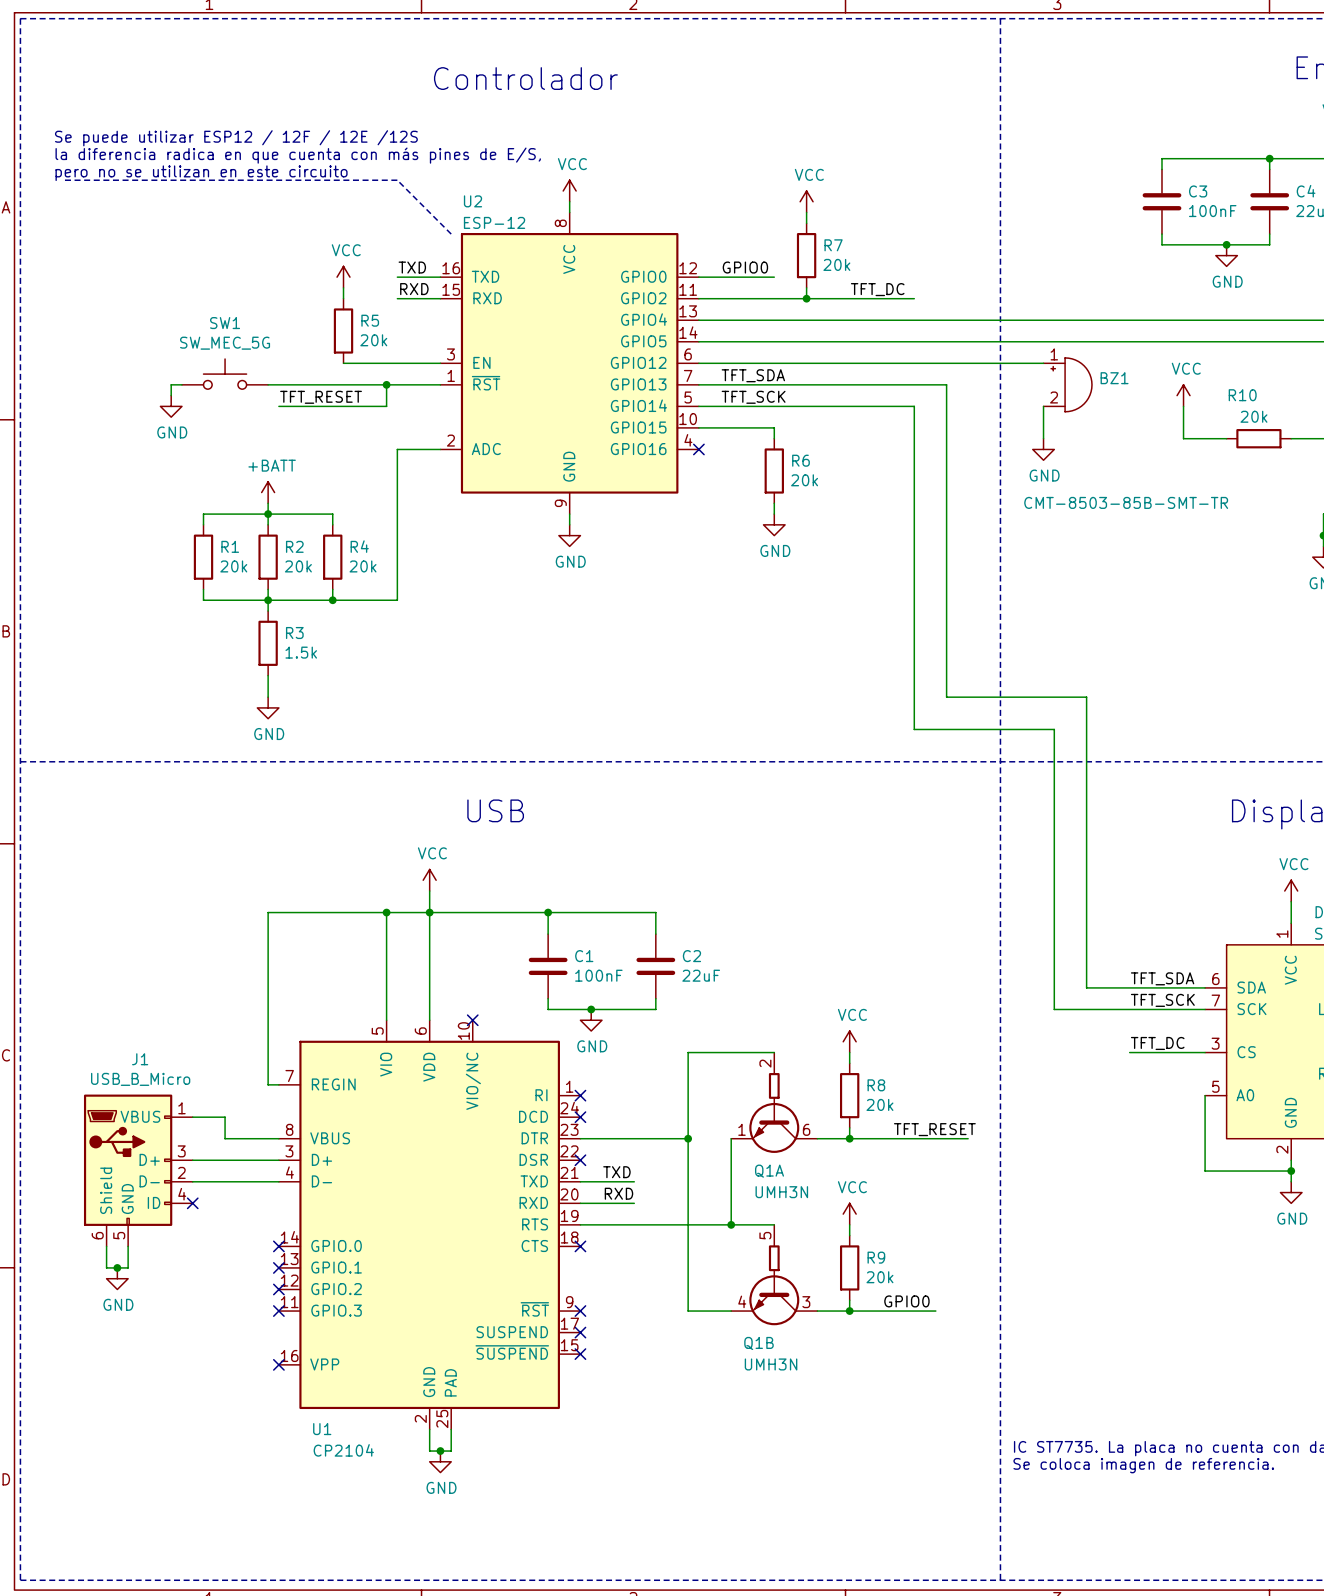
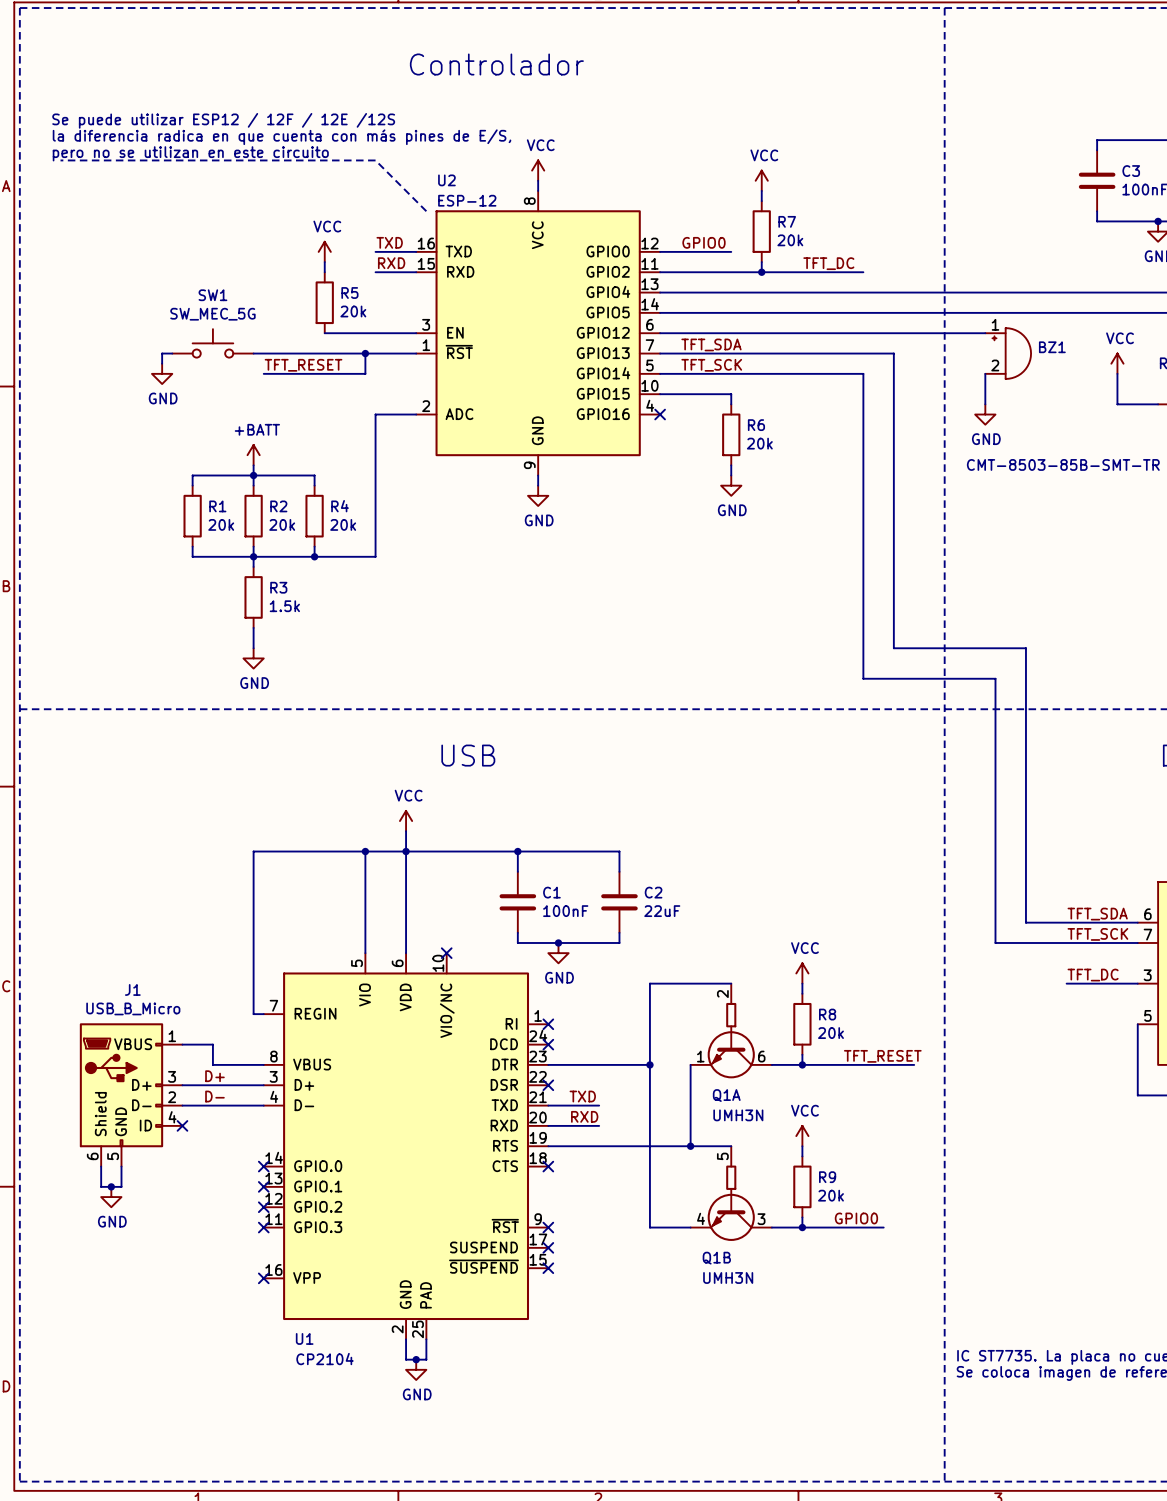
label: none -> D+ (214, 1076)
label: none -> D- (214, 1096)

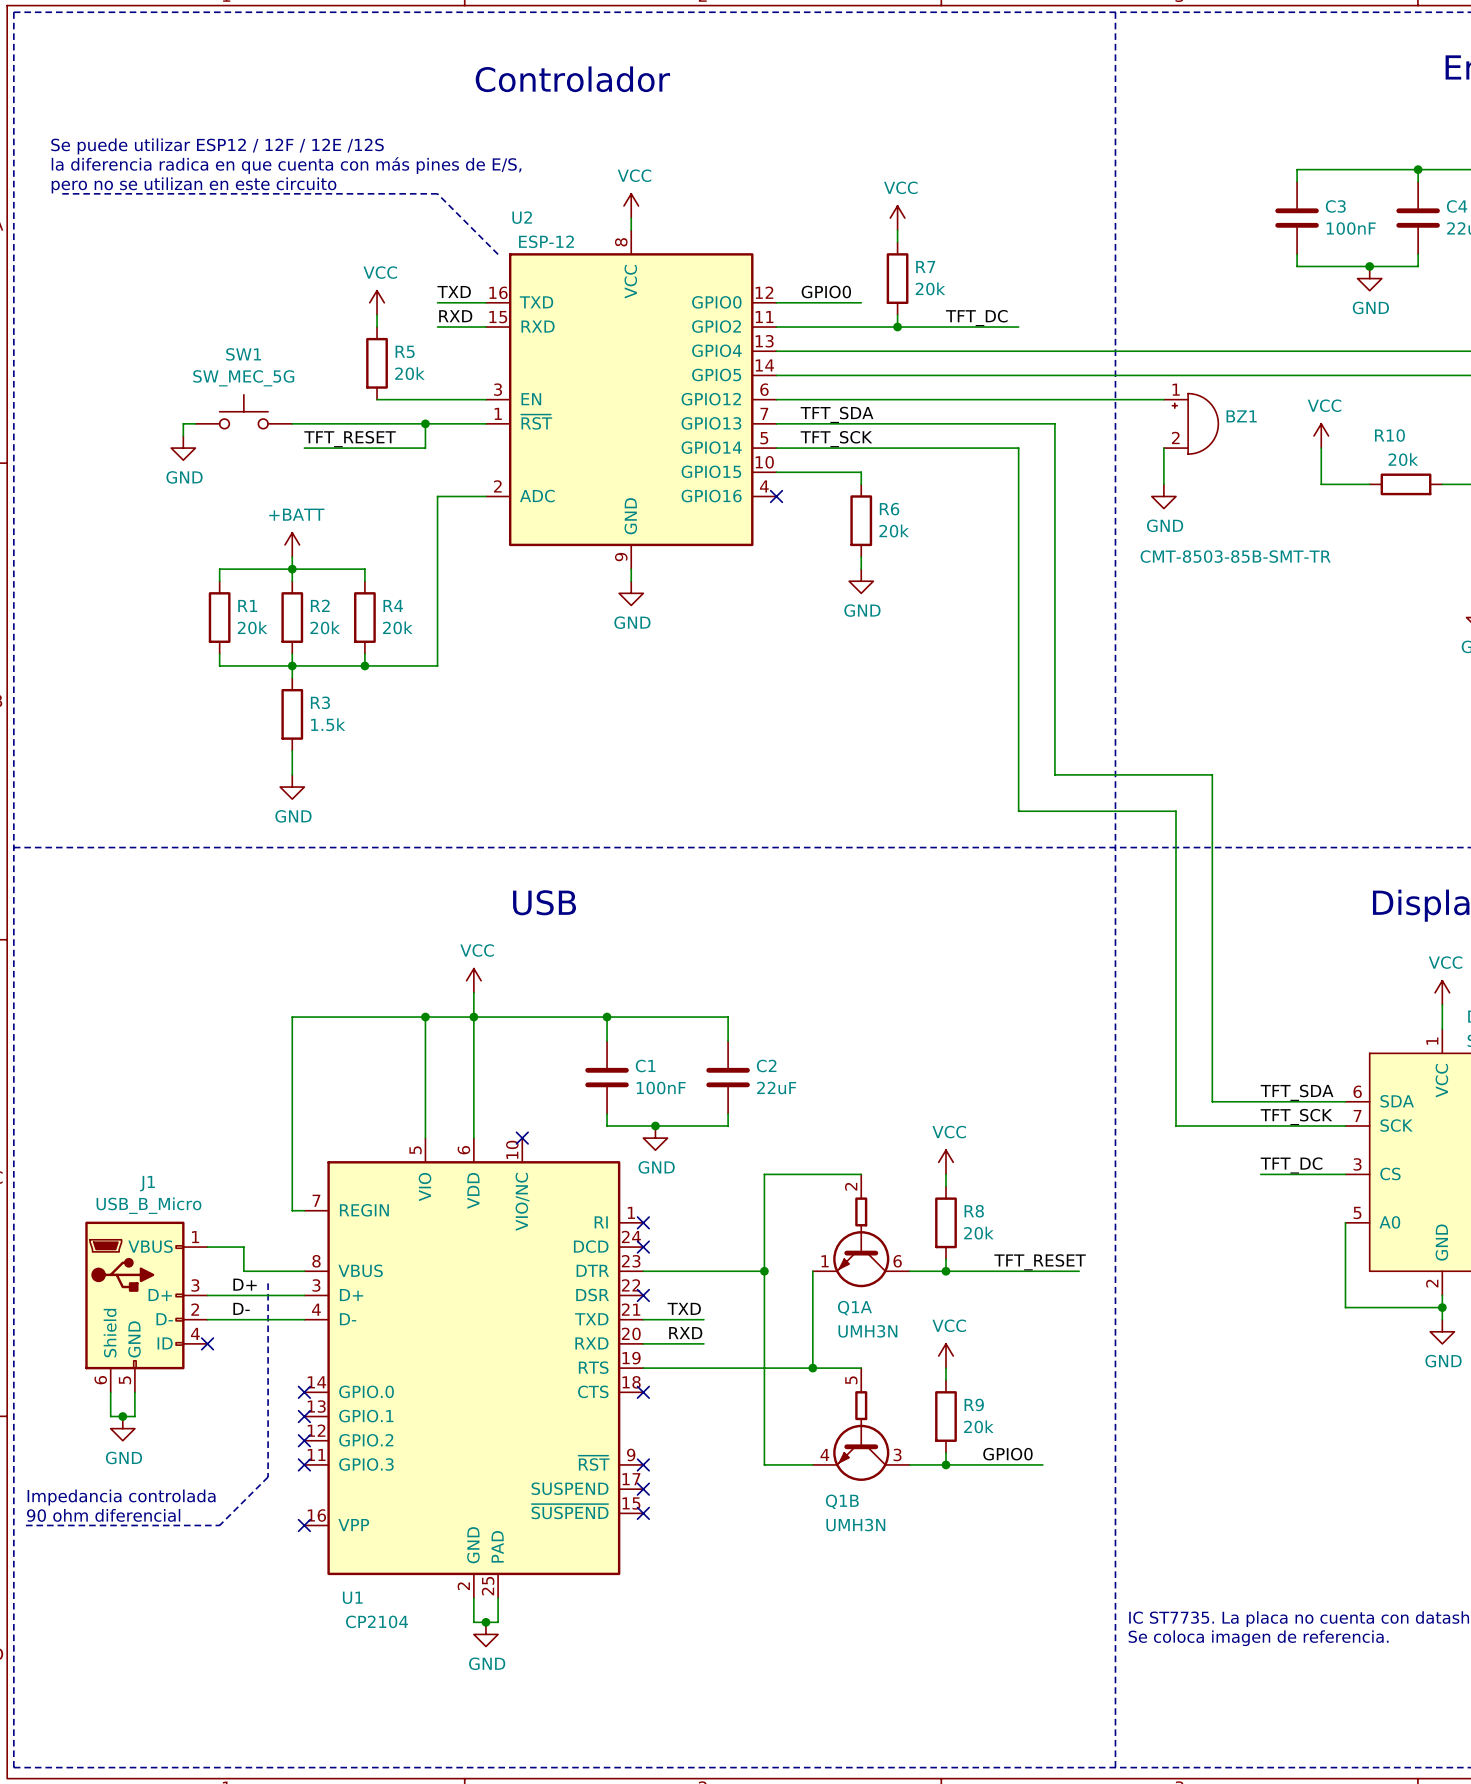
line: none -> (268, 1283) (268, 1477) (219, 1525) (25, 1525)
text: none -> Impedancia controlada (121, 1497)
text: none -> 90 ohm diferencial (103, 1515)

